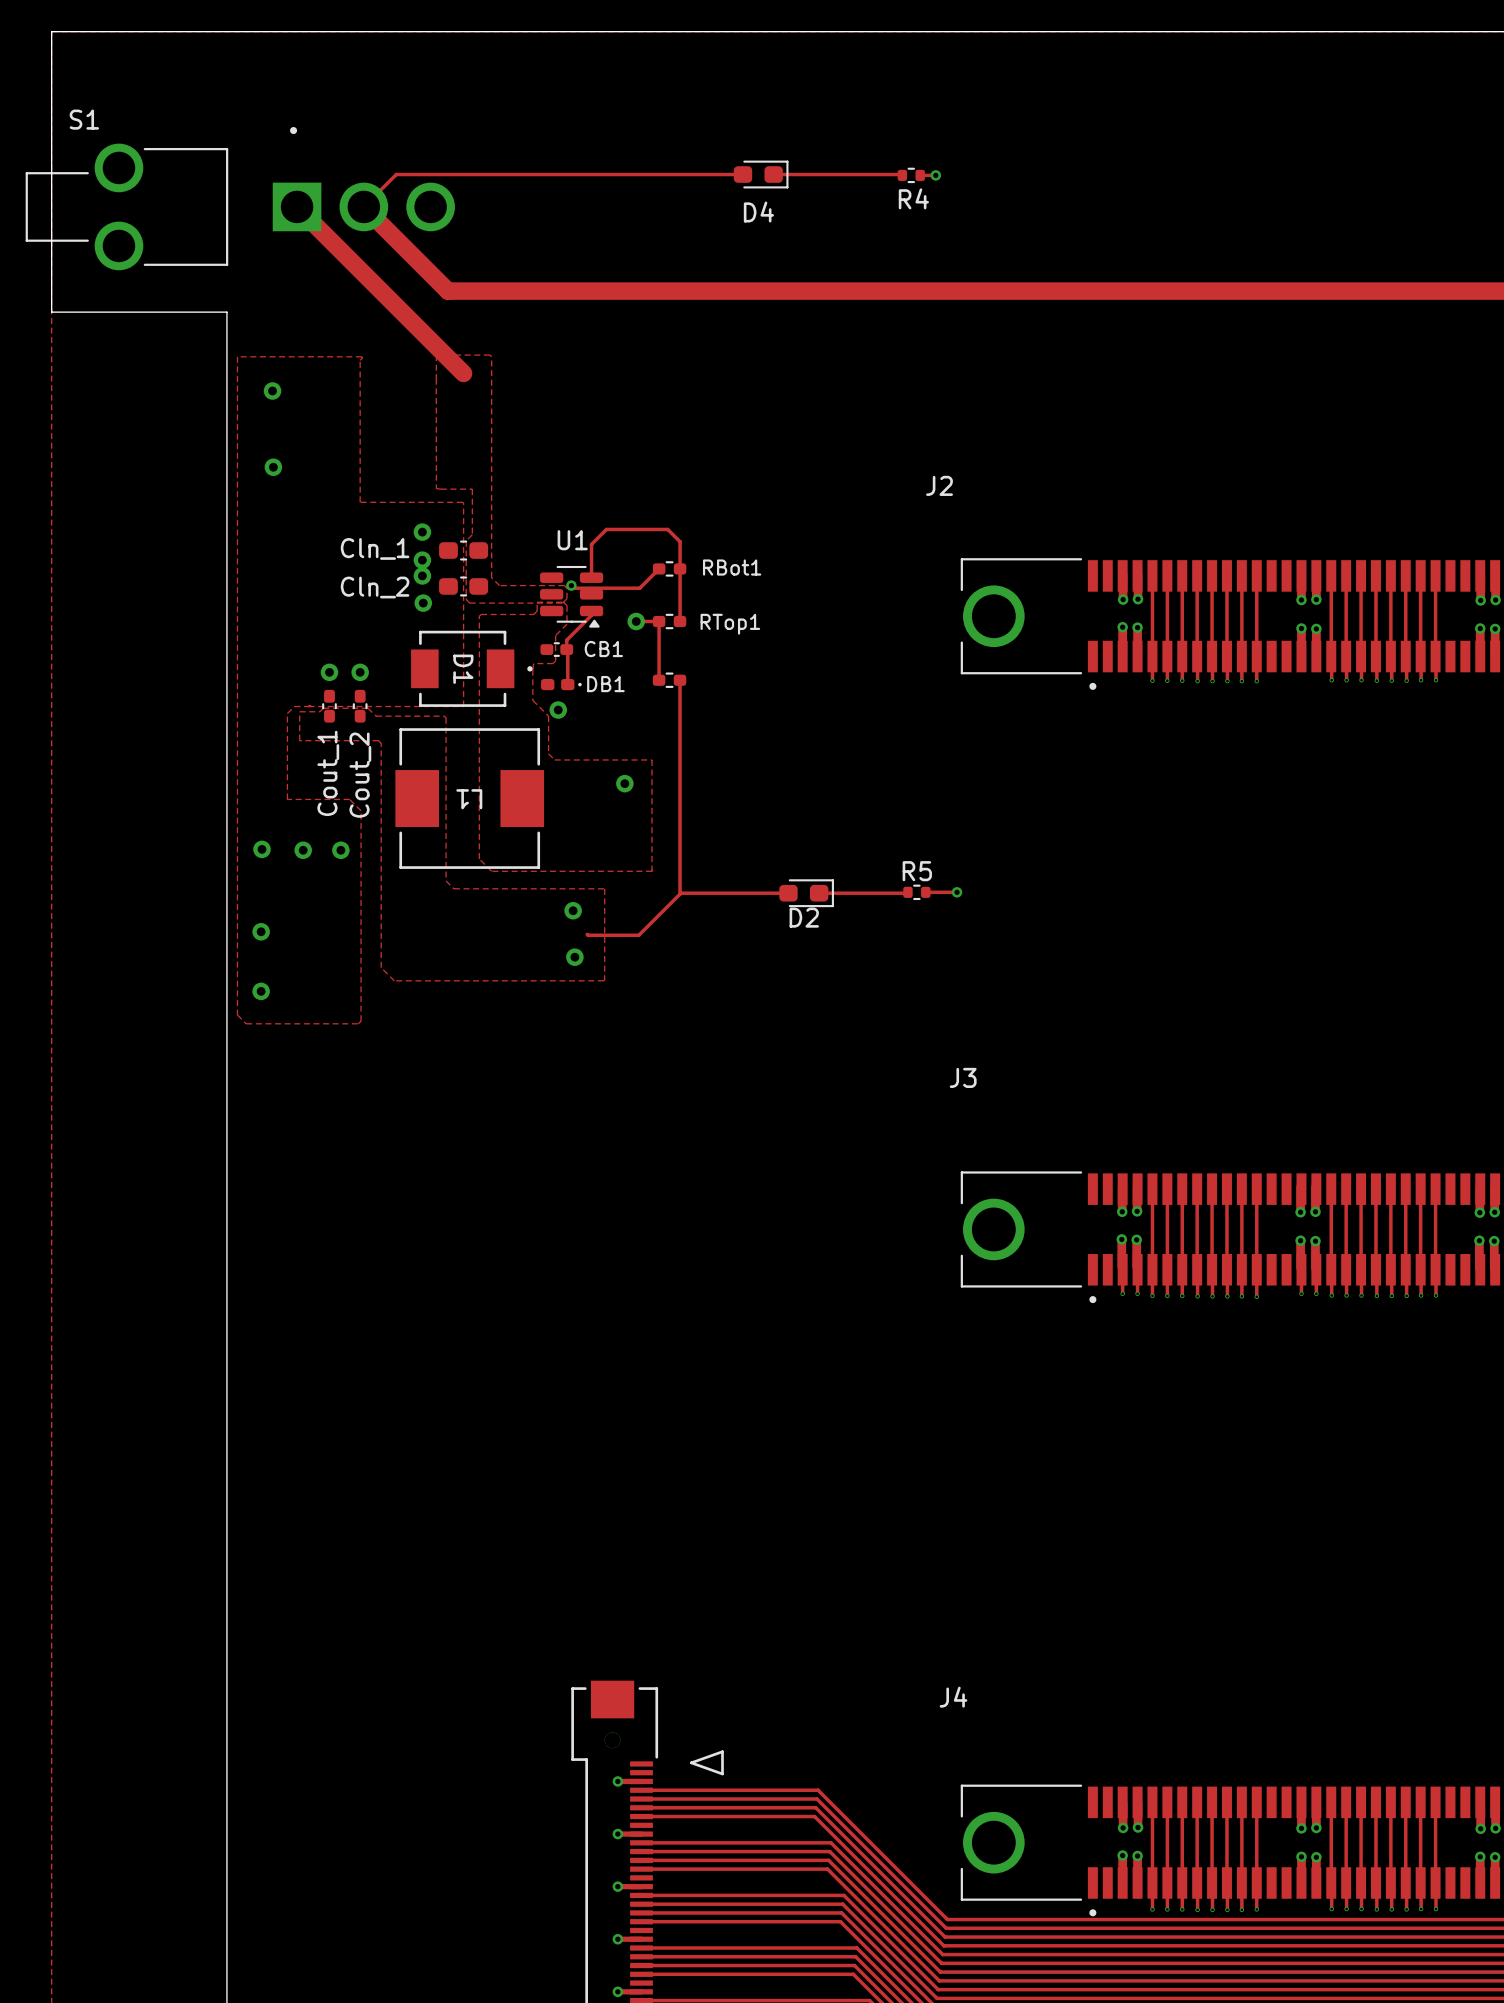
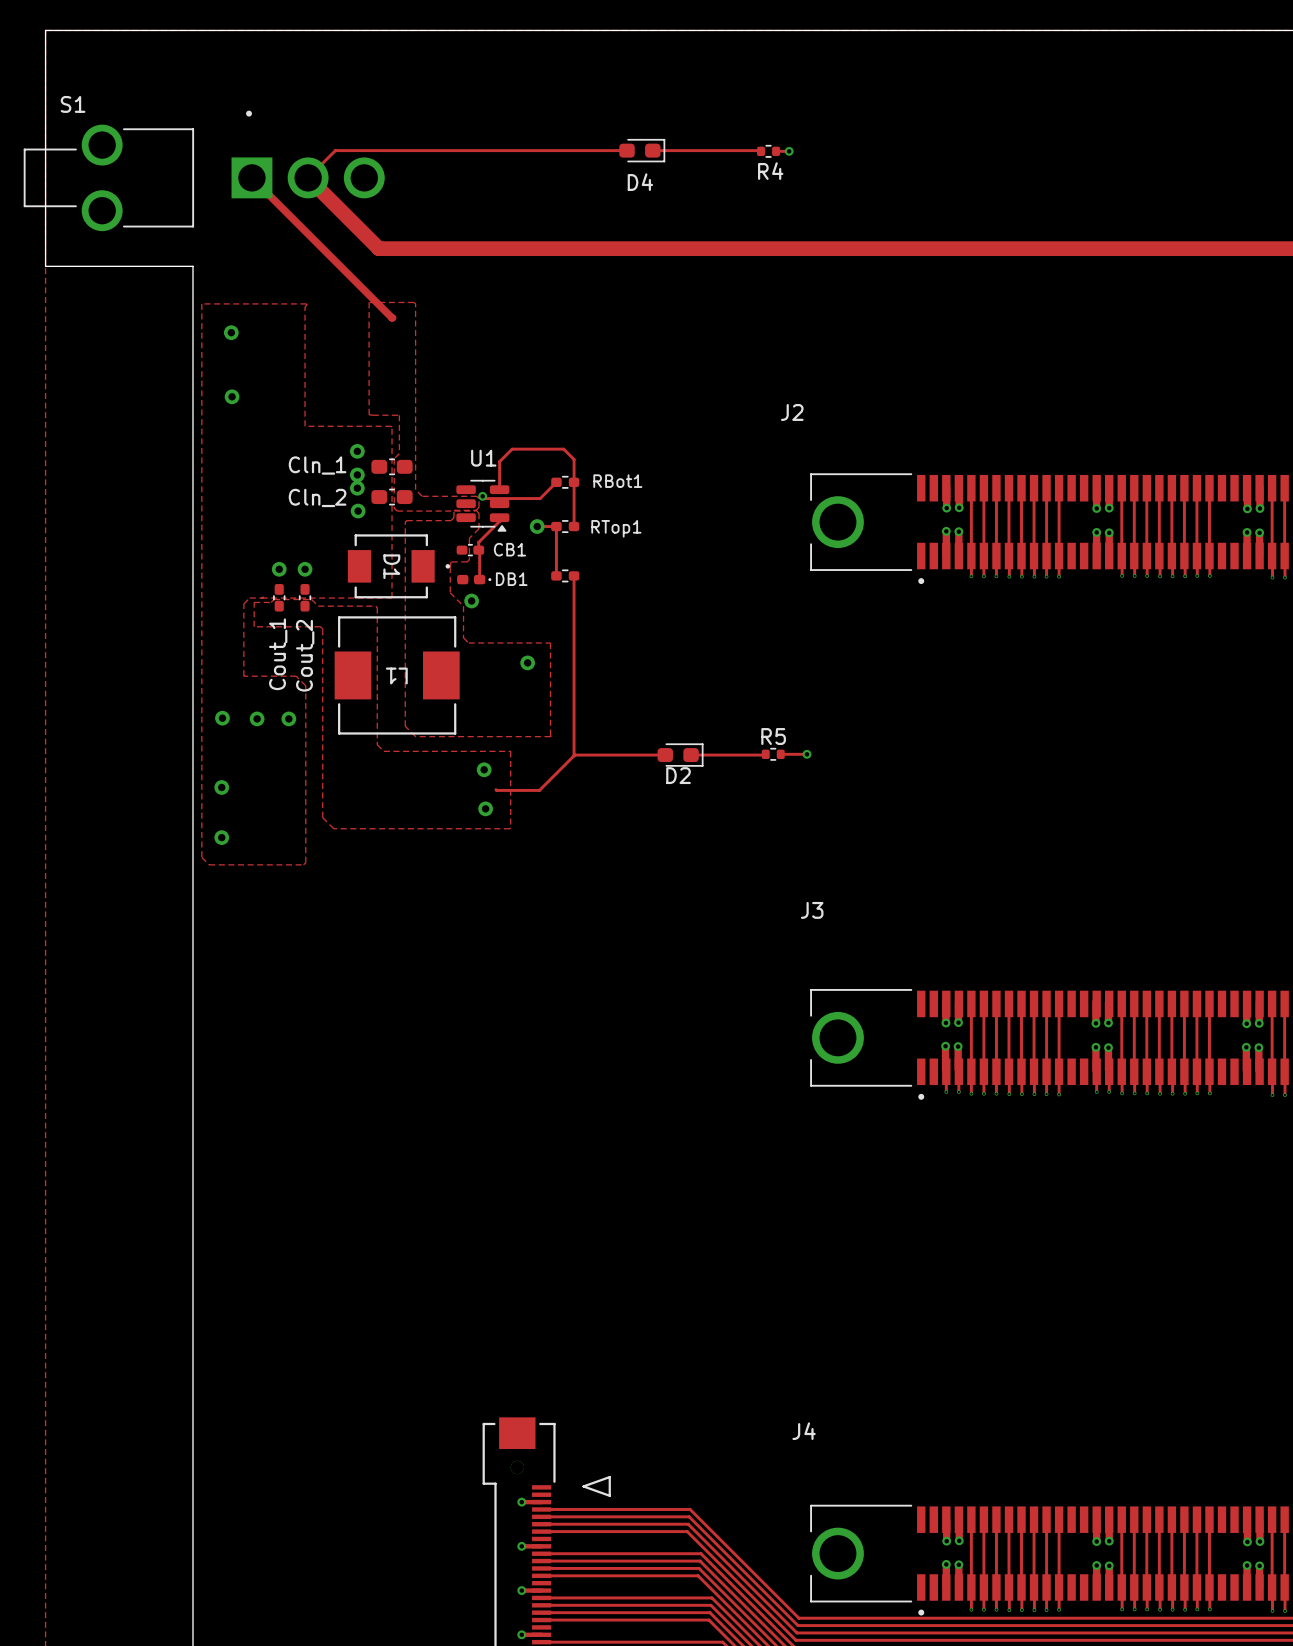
track width: thick (297, 206) (463, 373) -> thin (251, 177) (392, 317)

